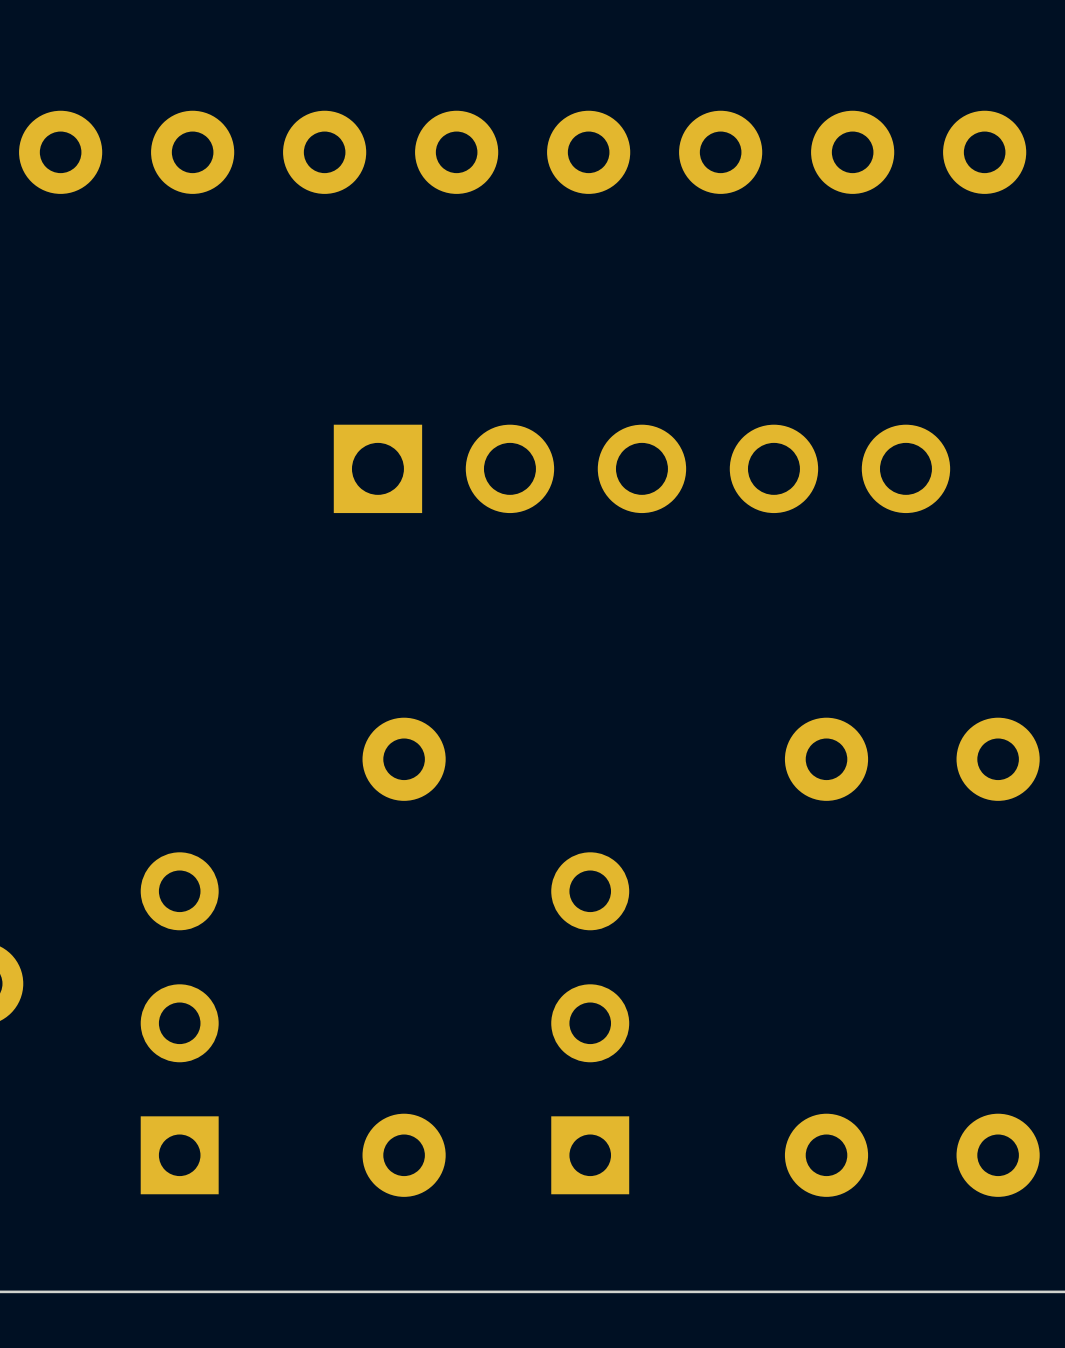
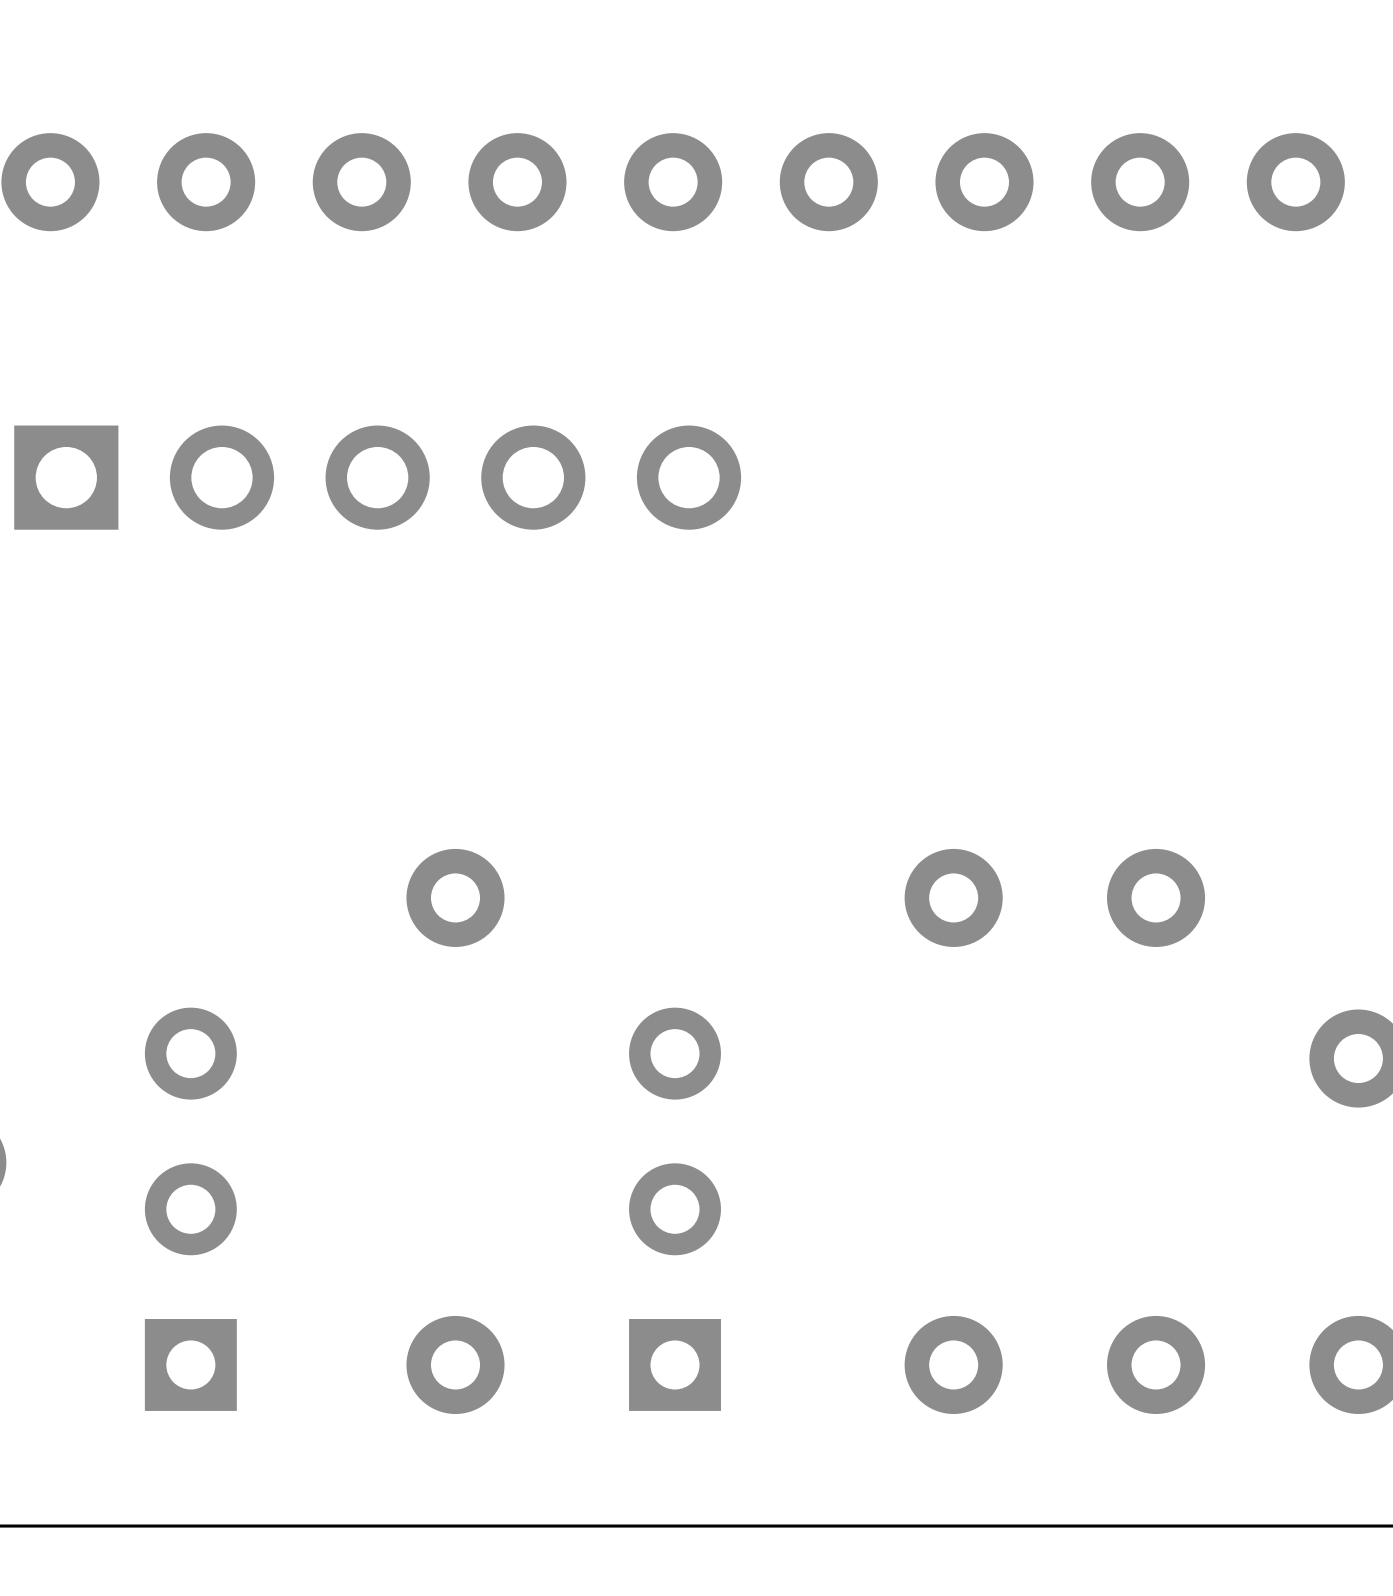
part position: (641, 468) -> (377, 477)

